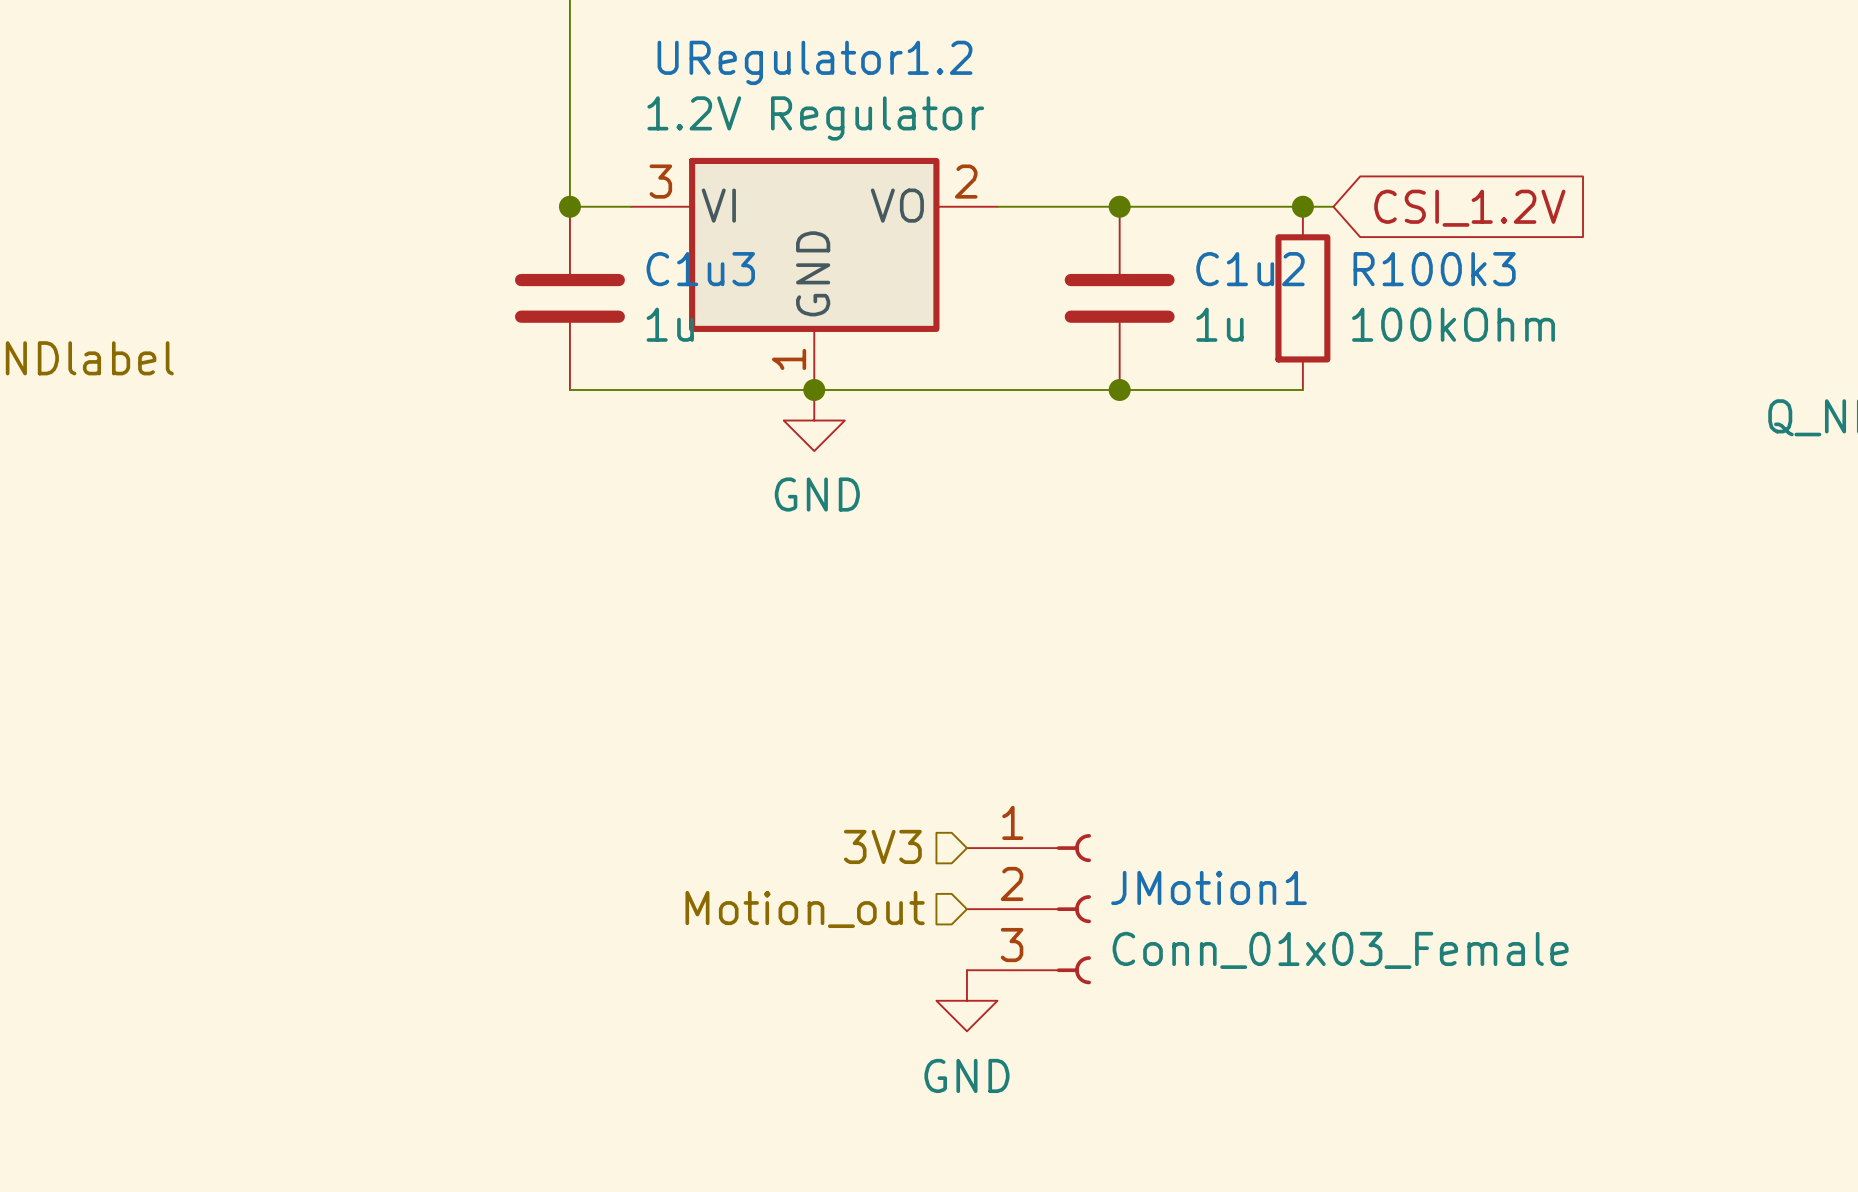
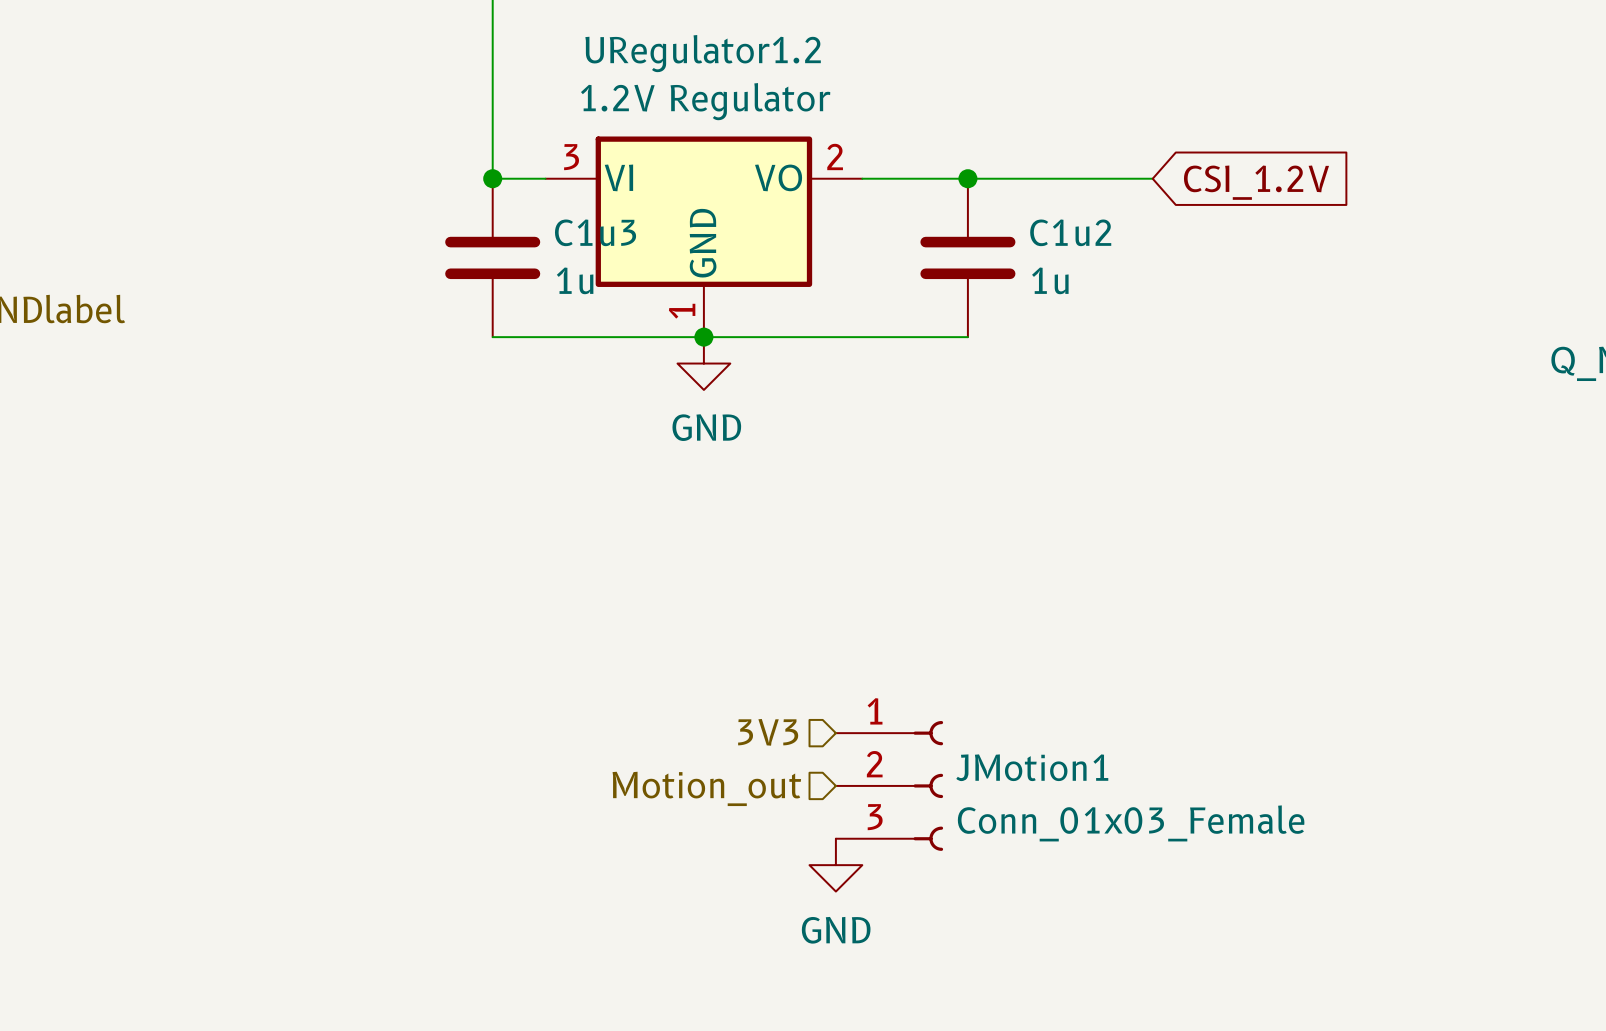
junction: (1302, 206) -> none
R100k3: 100kOhm (1302, 298) -> none
wire: (1119, 389) (1302, 389) -> none
junction: (1119, 389) -> none

